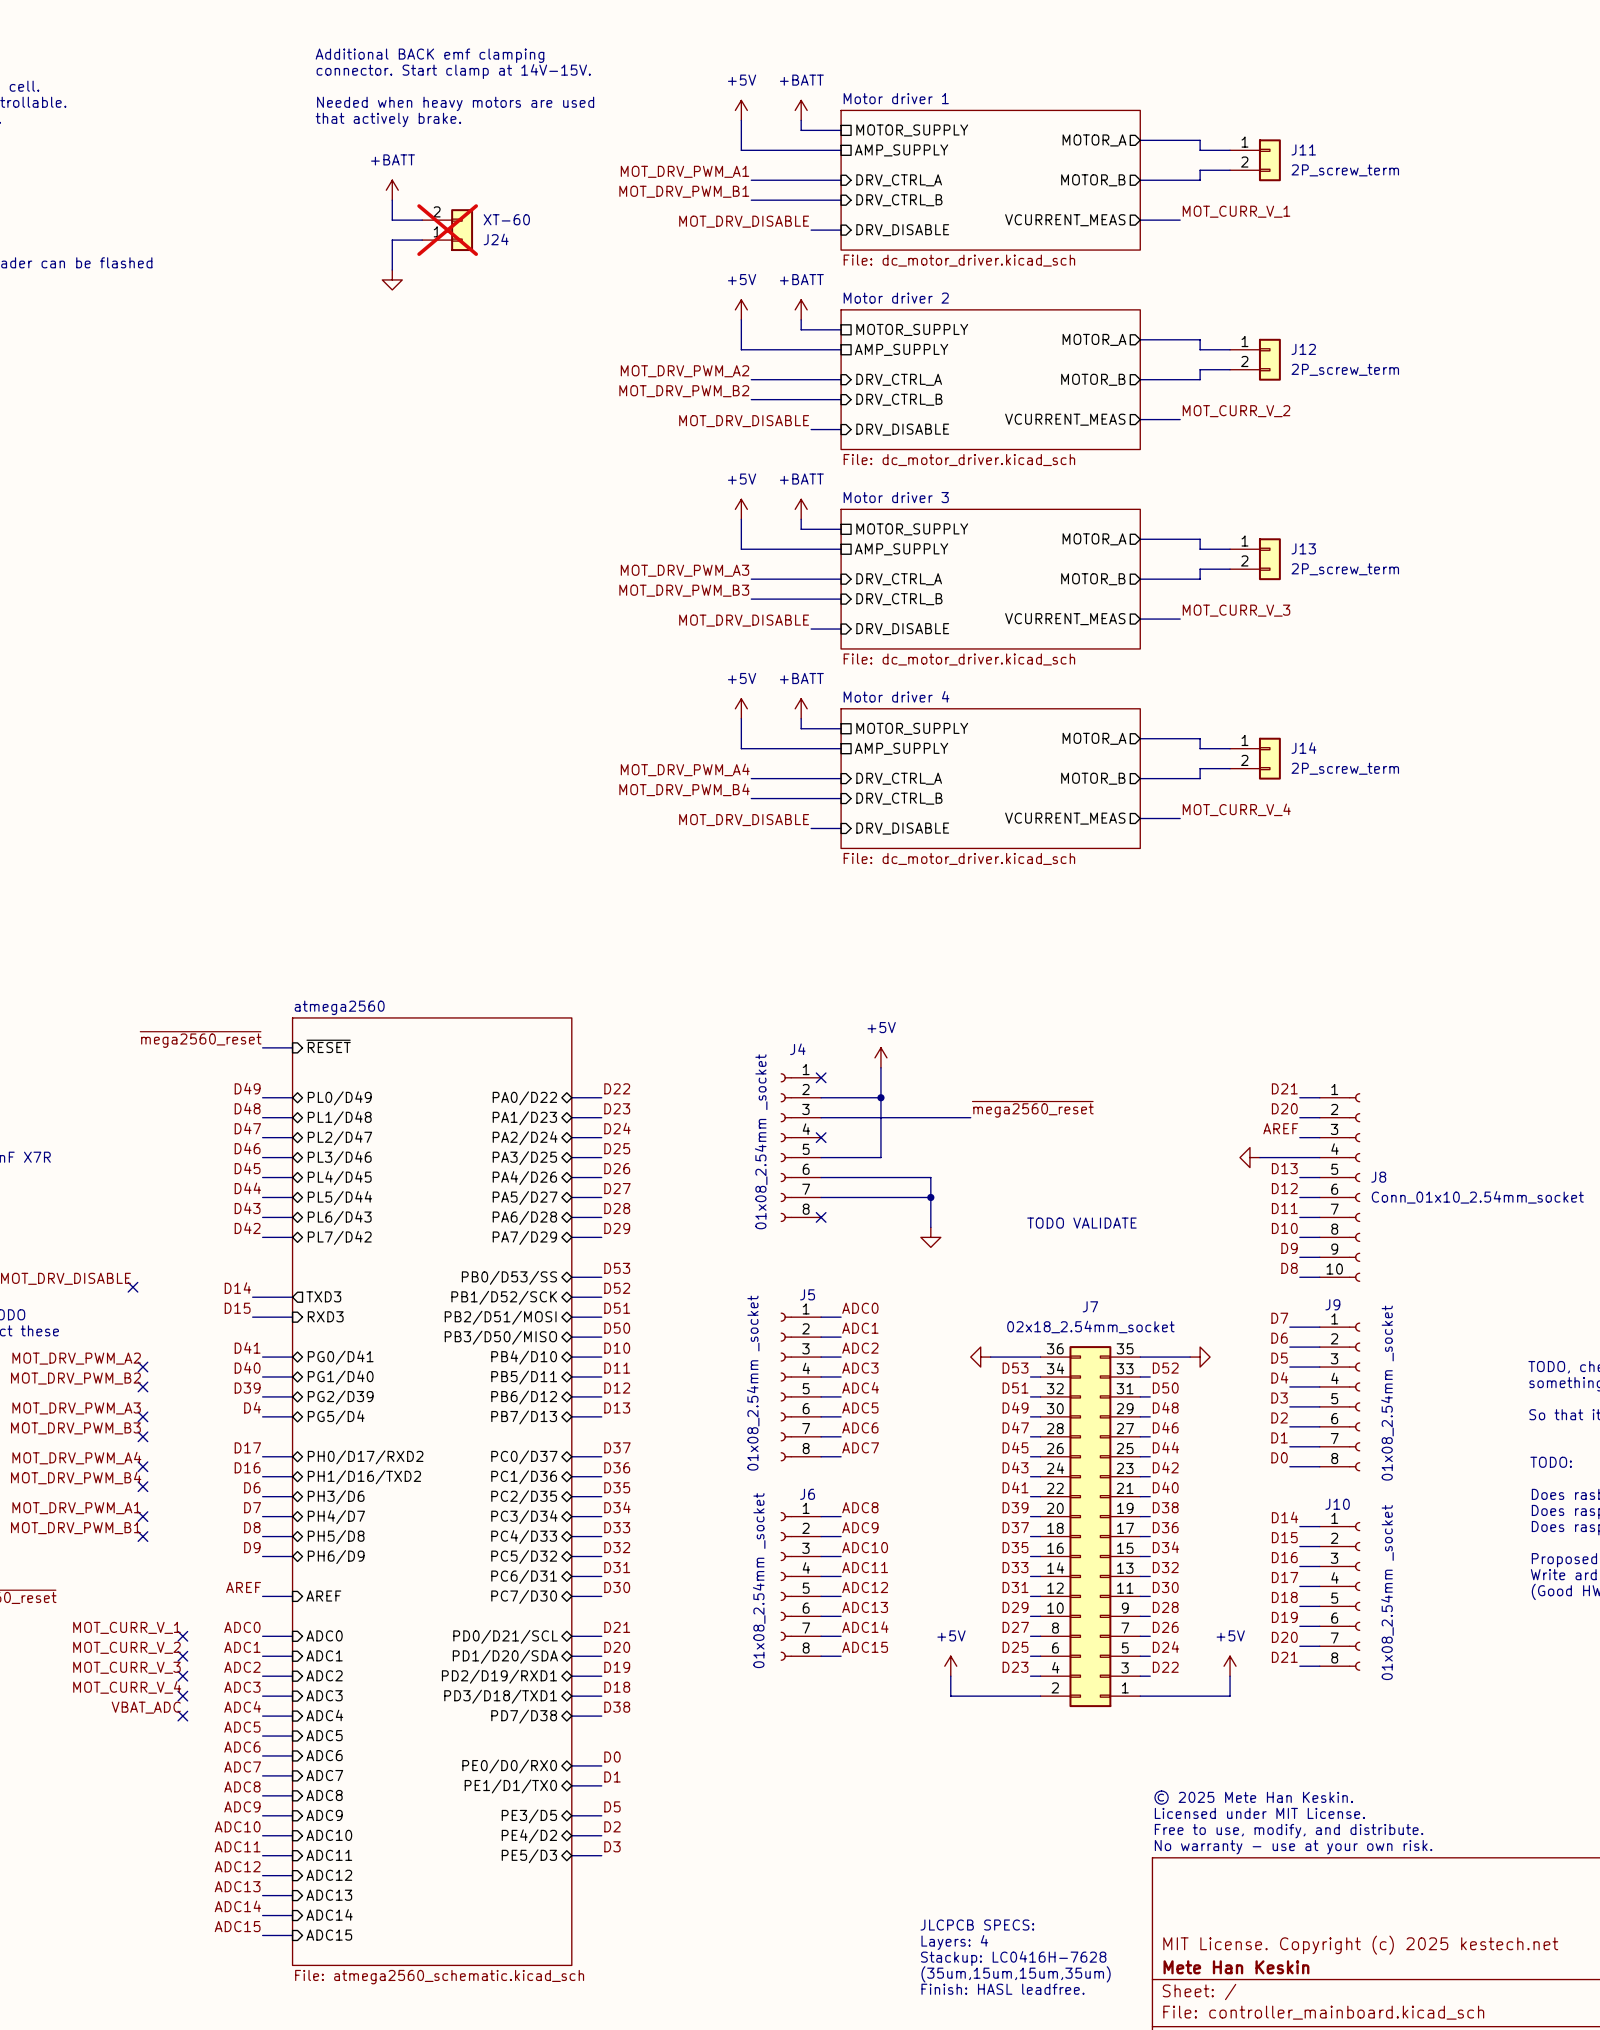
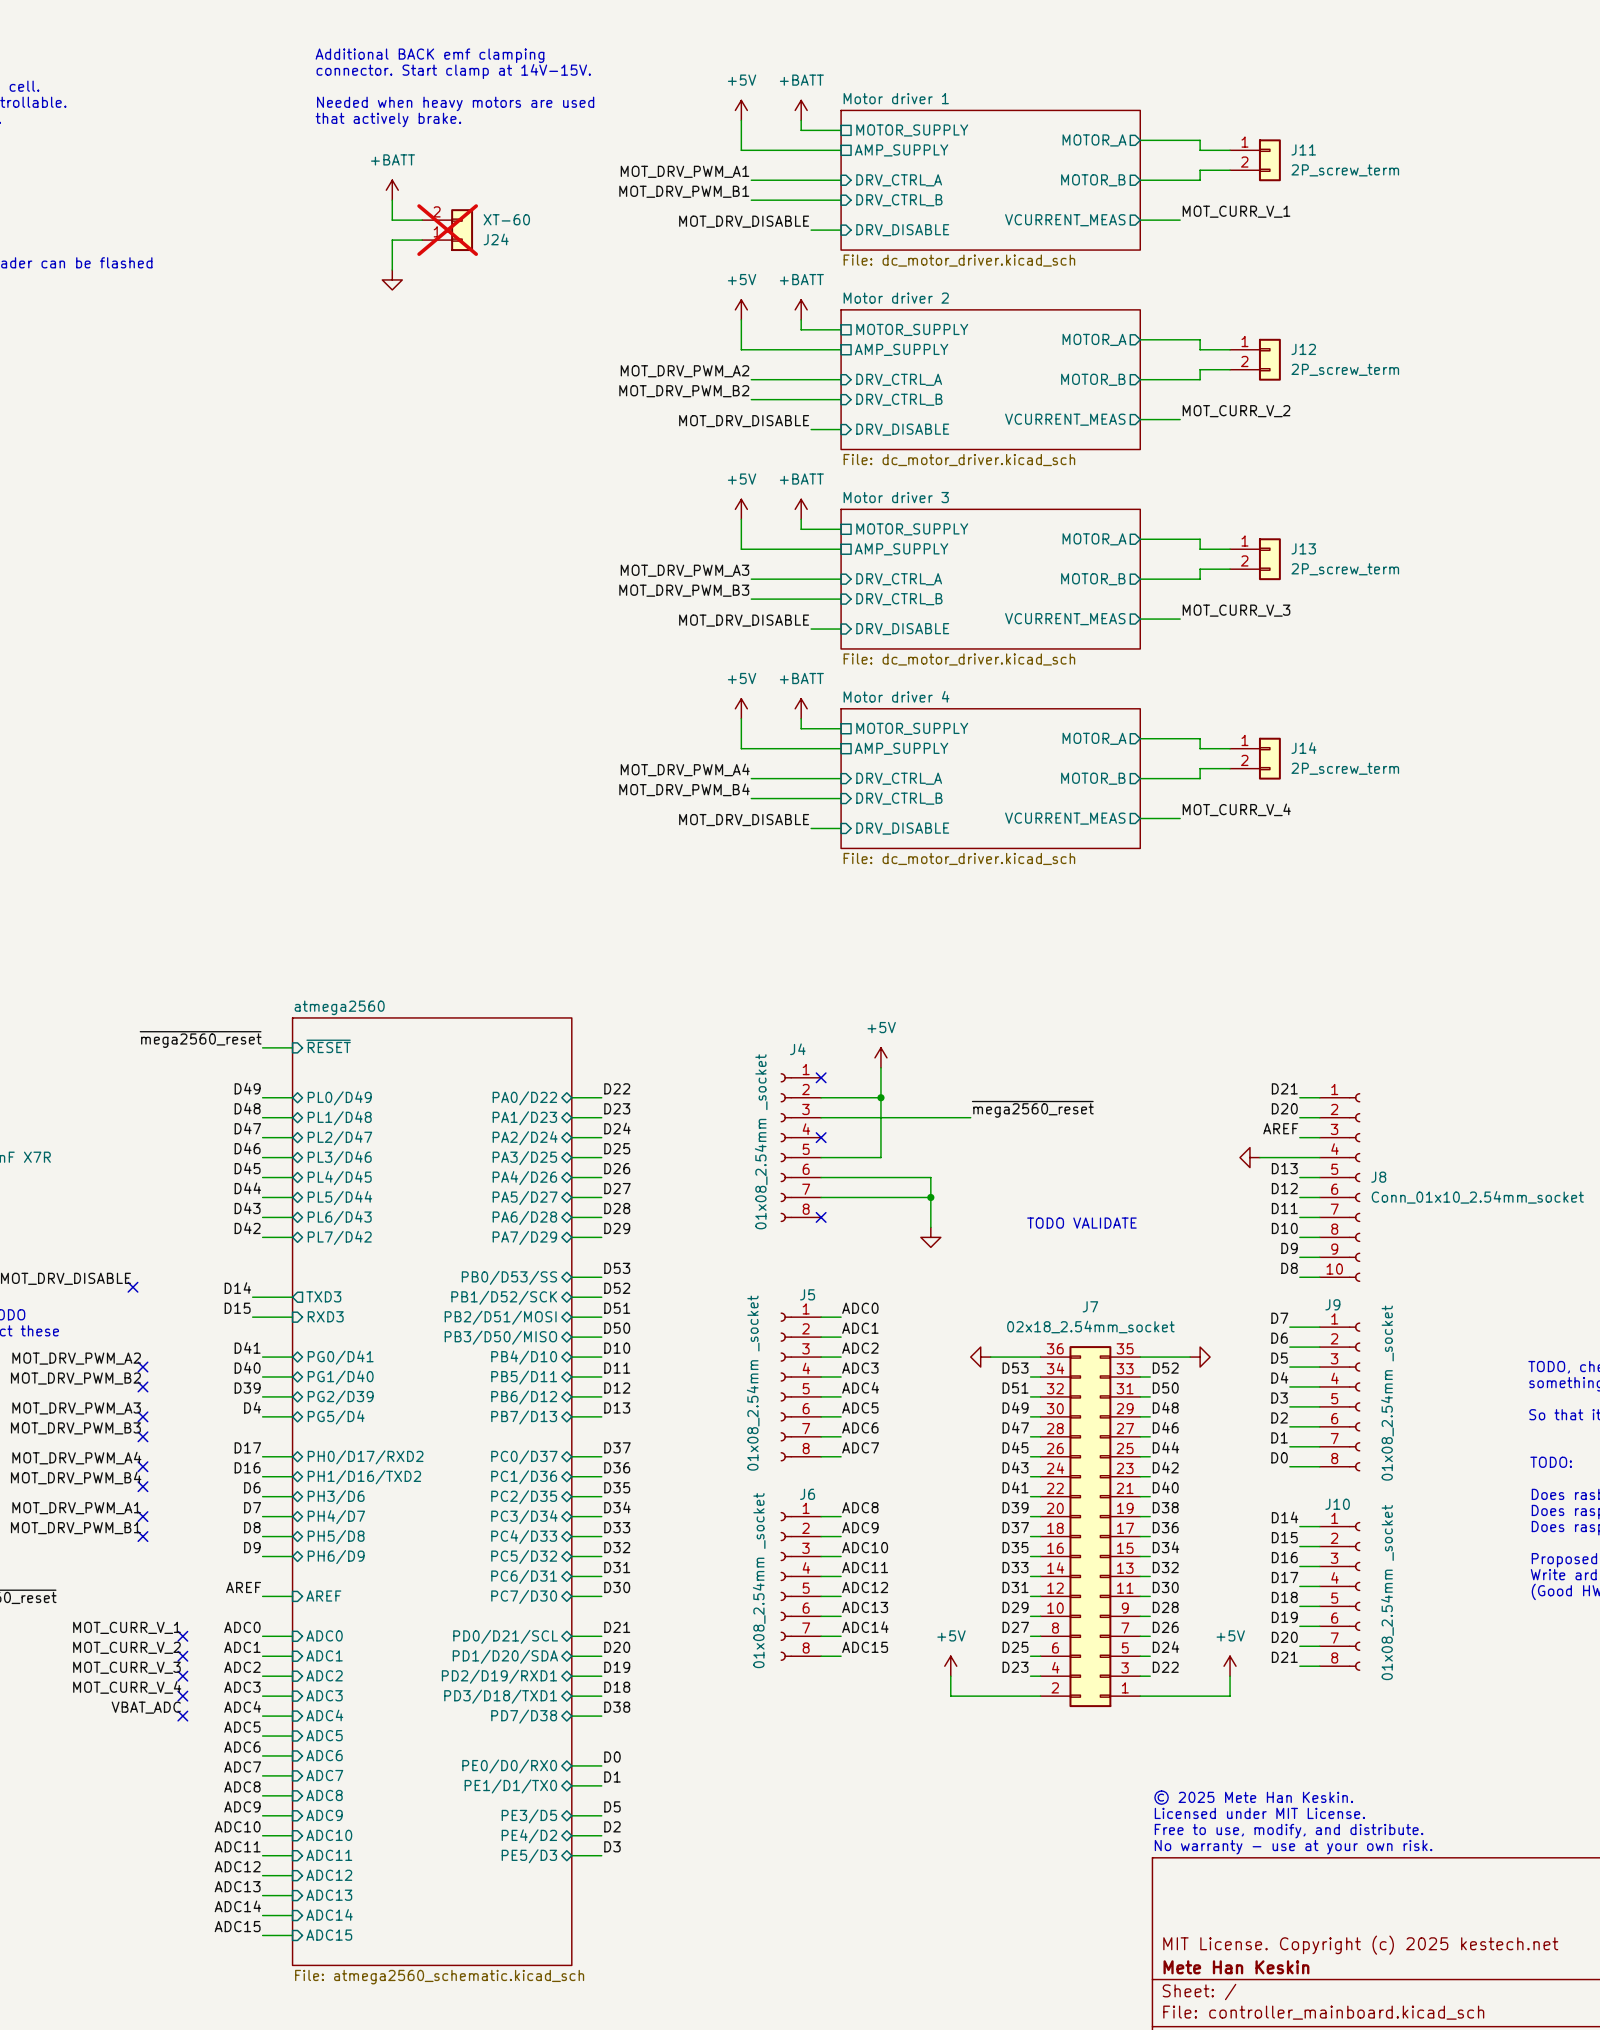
text: JLCPCB SPECS: (977, 1925) -> none
text: Layers: 4 (954, 1942) -> none
text: Stackup: LC0416H-7628 (1013, 1958) -> none
text: (35um,15um,15um,35um) (1016, 1974) -> none
text: Finish: HASL leadfree. (1003, 1989) -> none

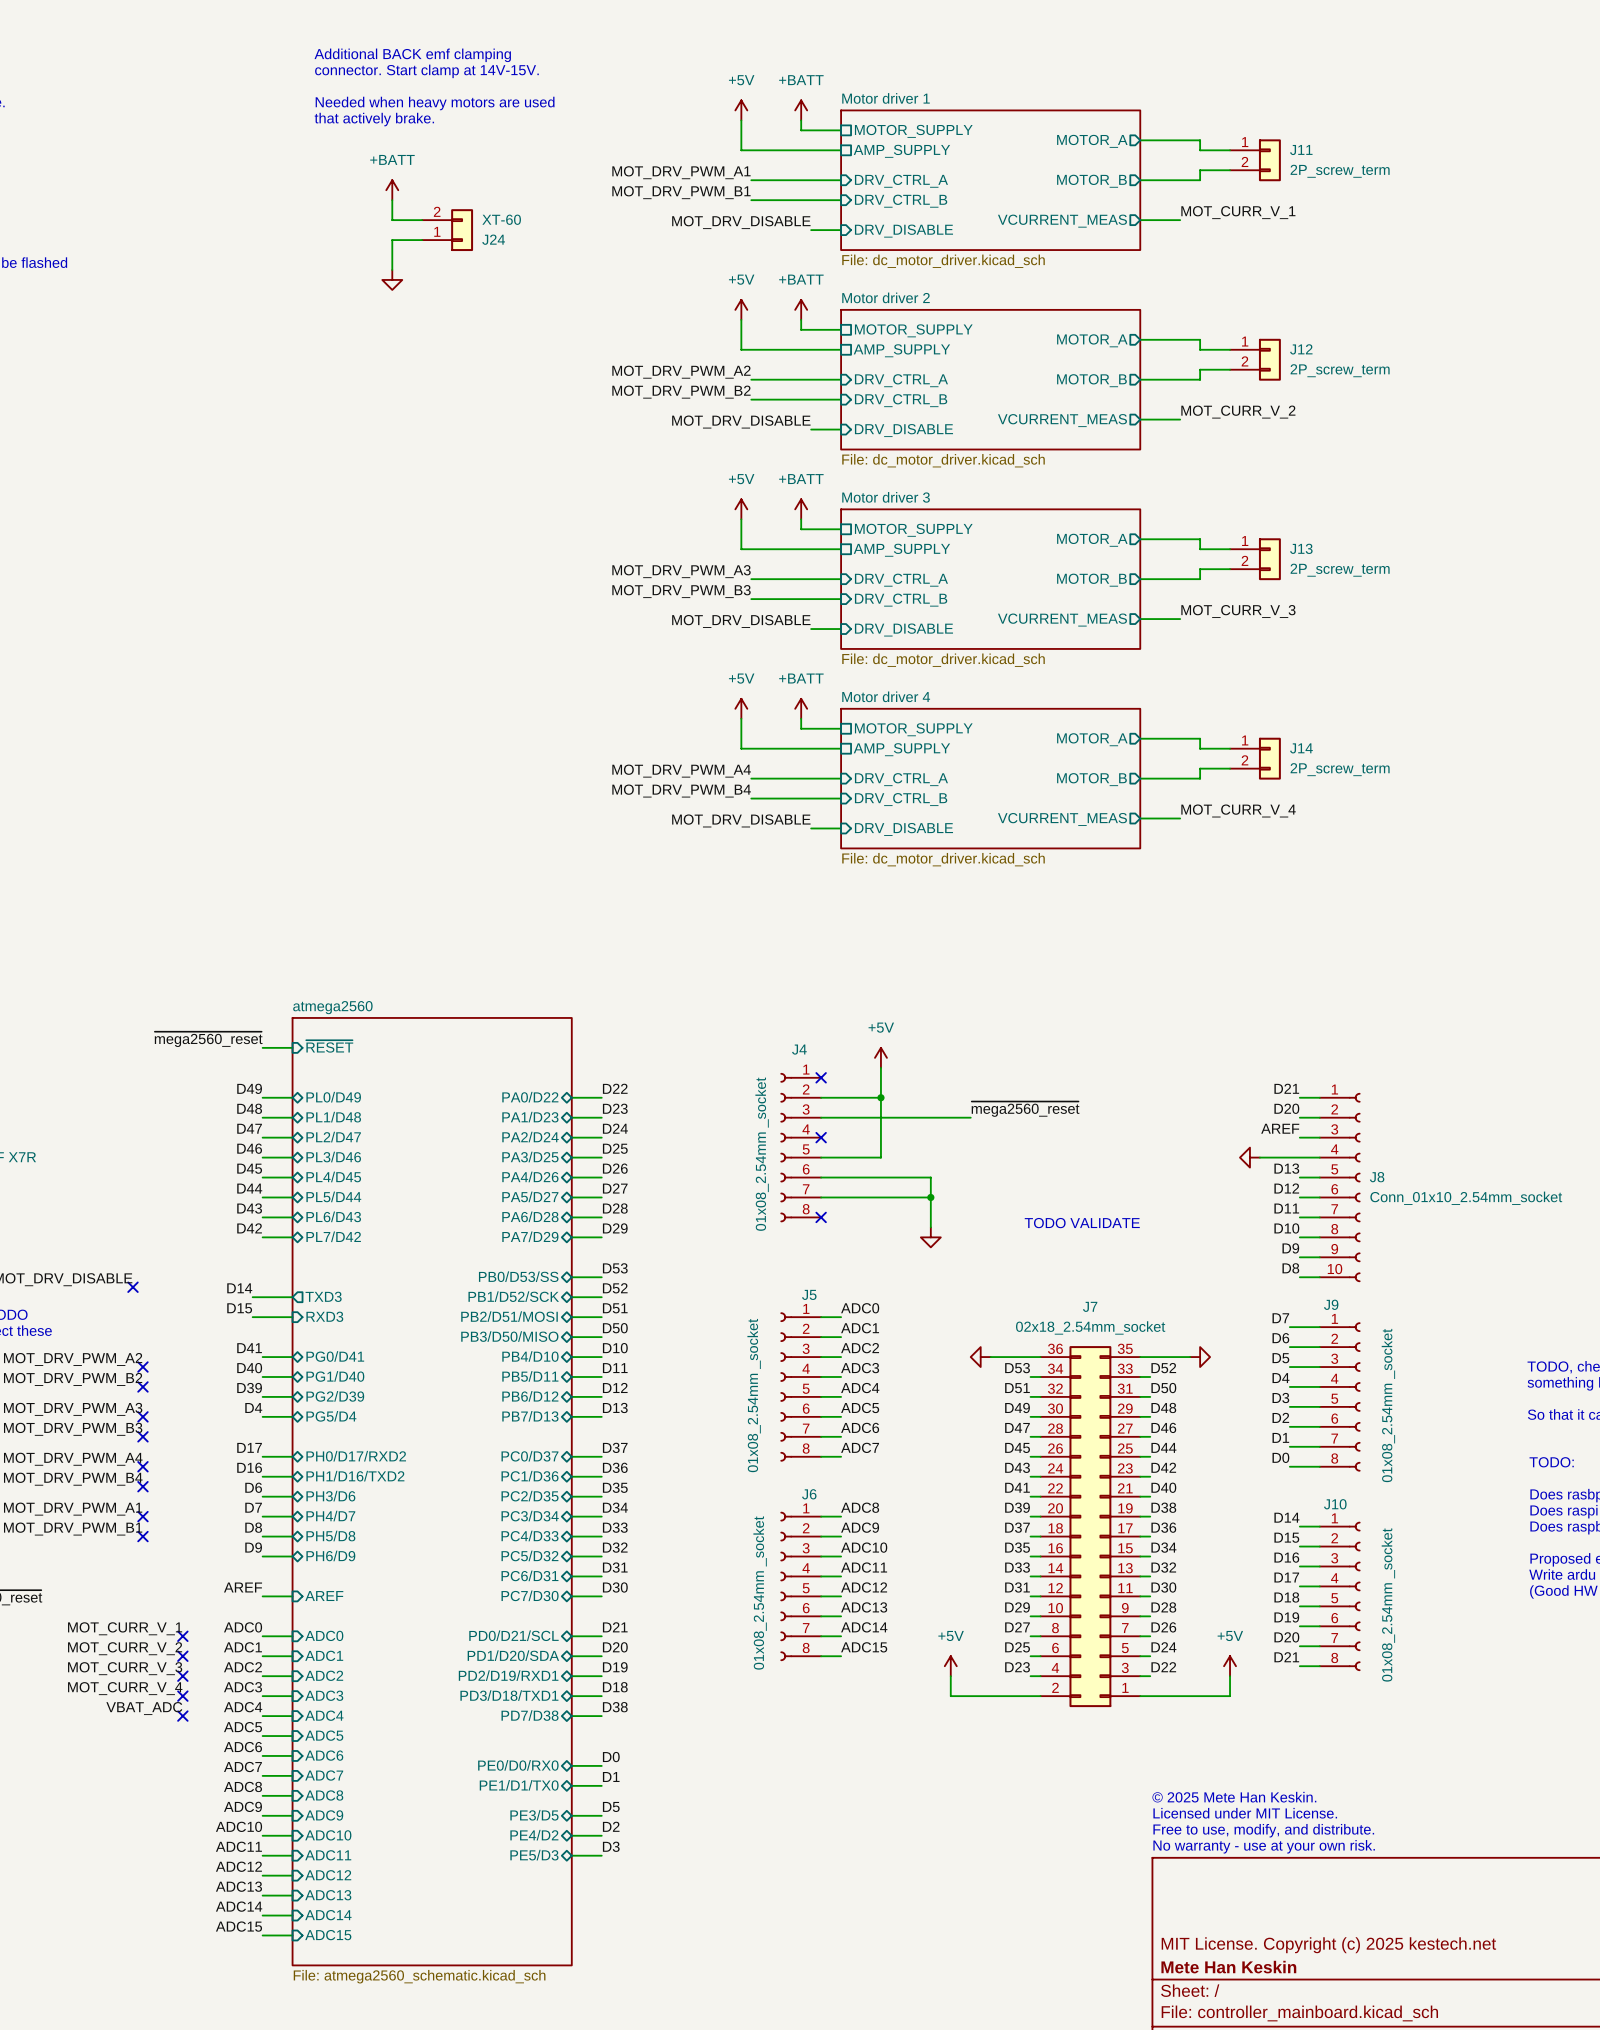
J24 do-not-place cross: (447, 230) -> none

